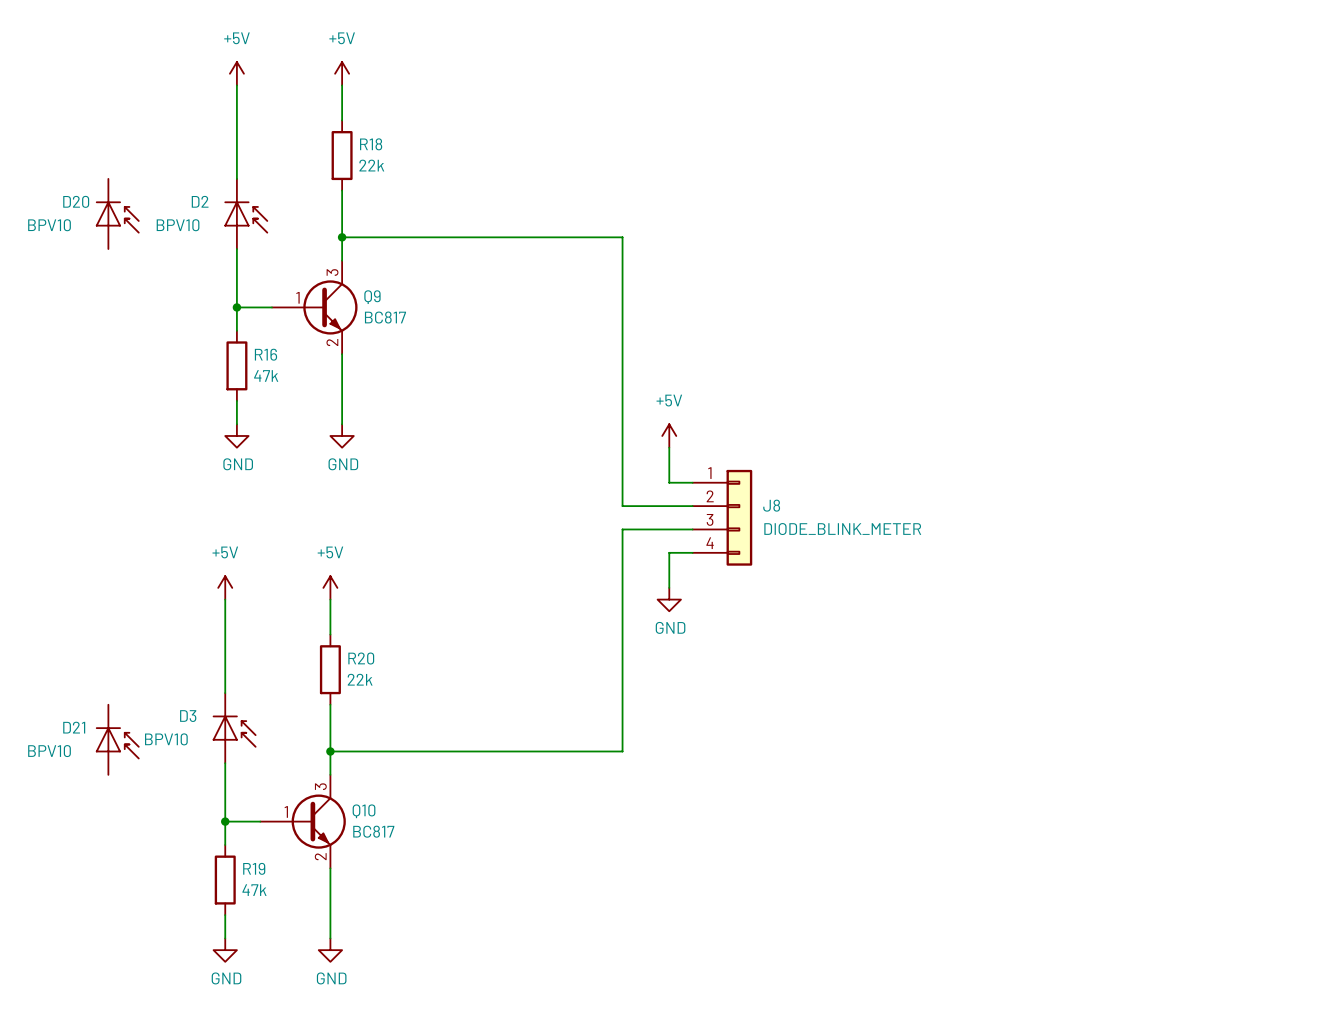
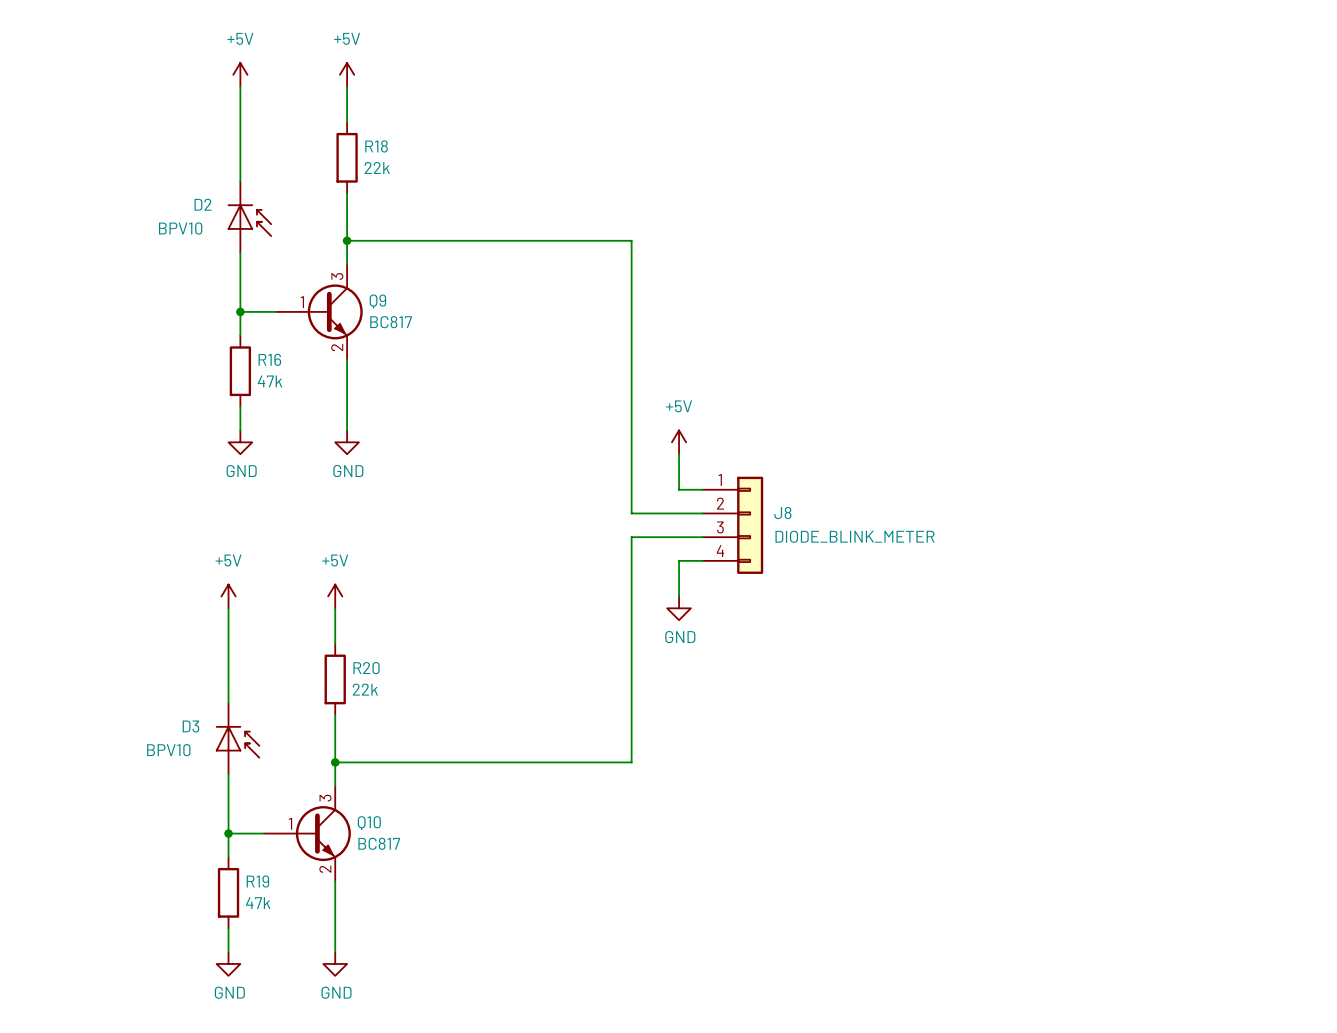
D20: BPV10 (117, 213) -> none
D21: BPV10 (117, 739) -> none

